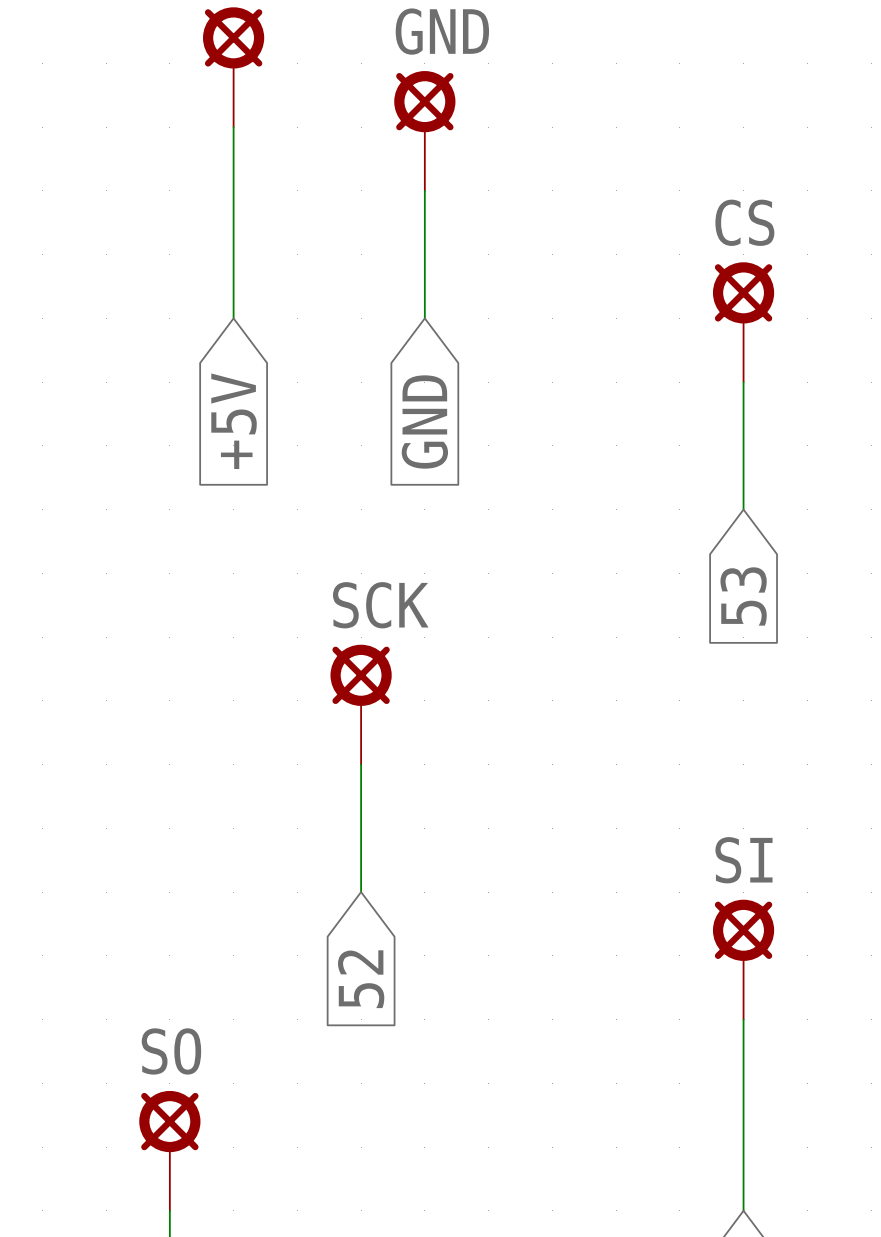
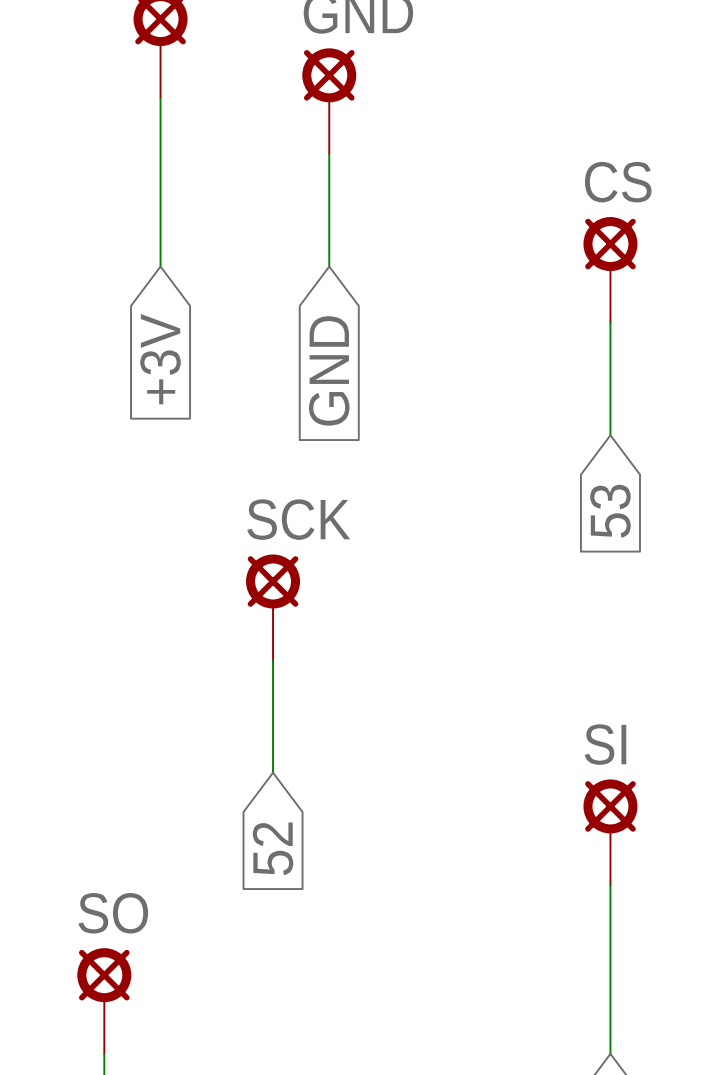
global label: +5V (234, 421) -> +3V (160, 359)

